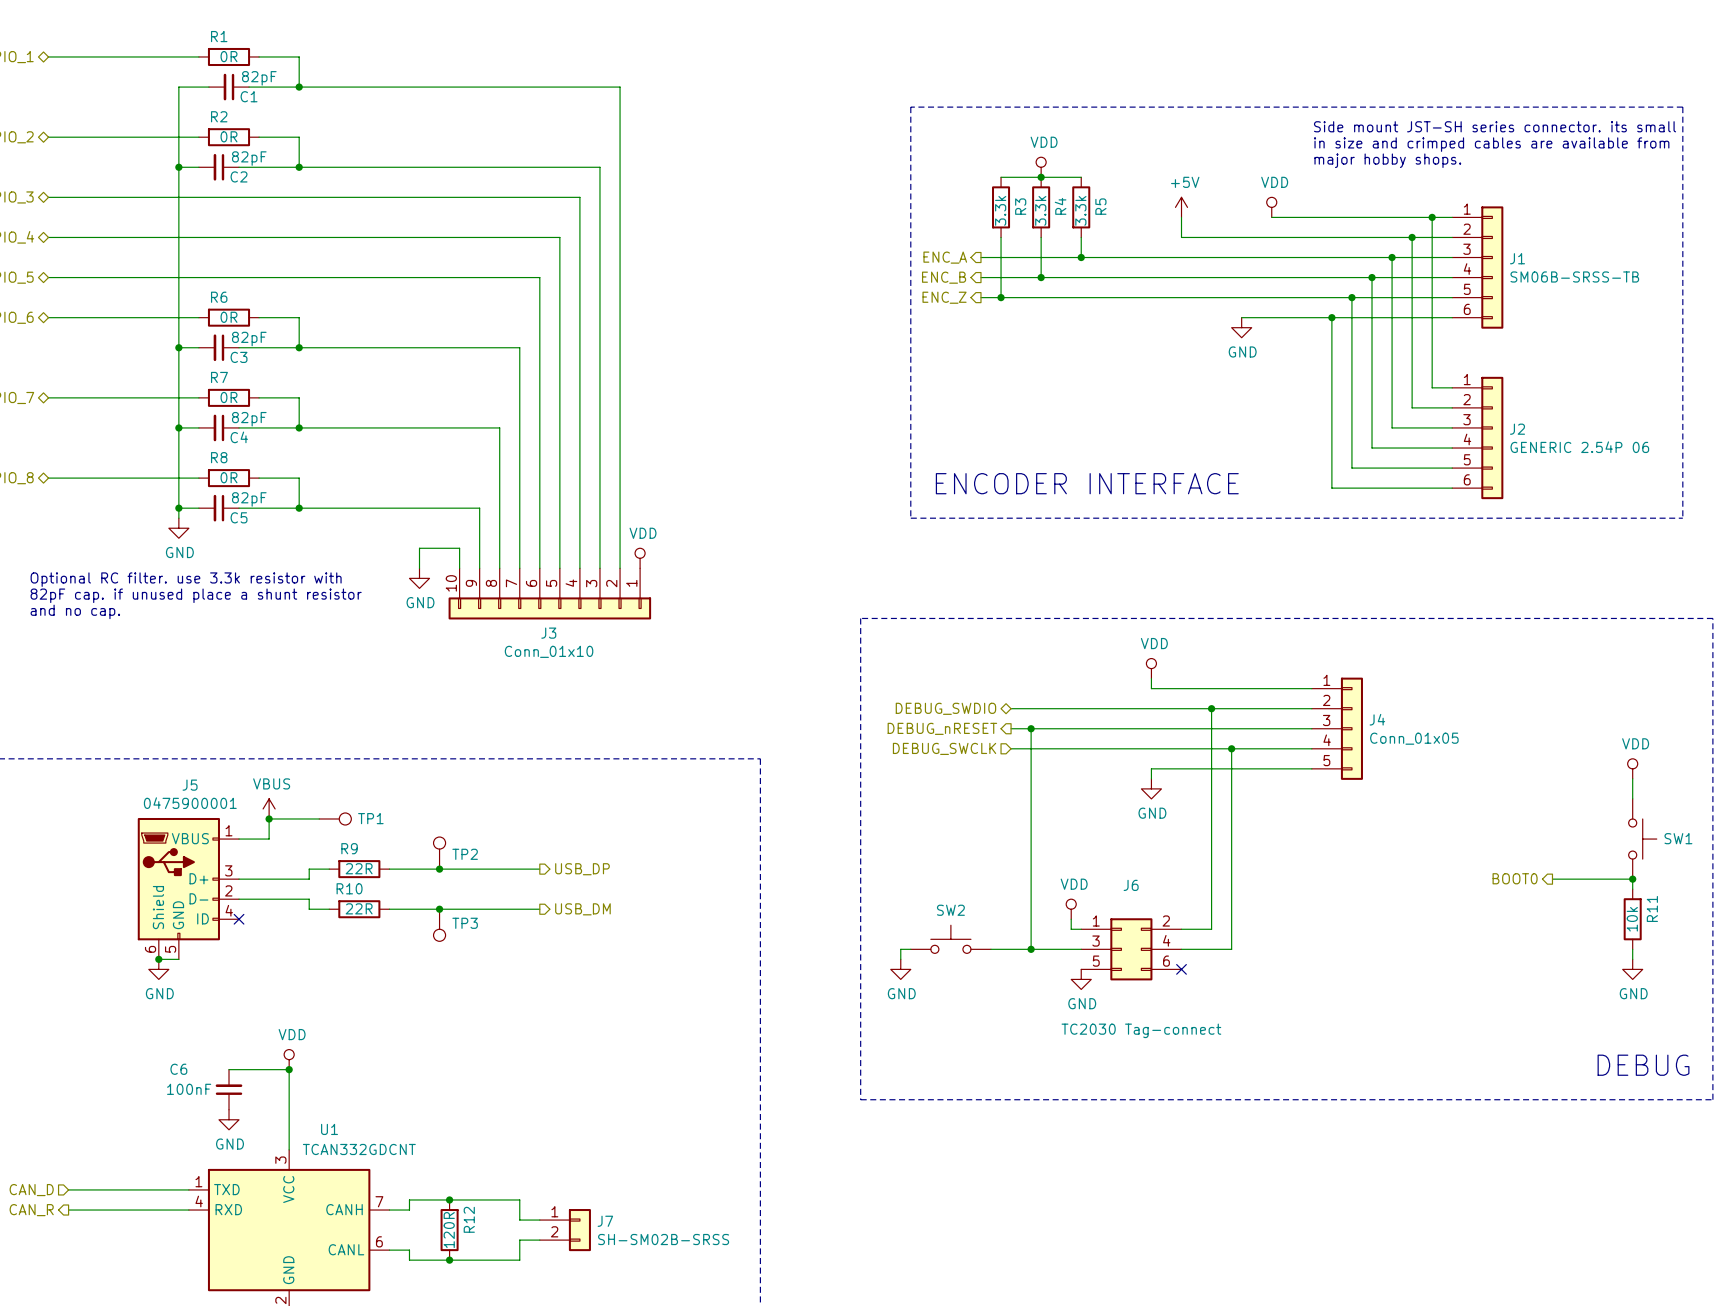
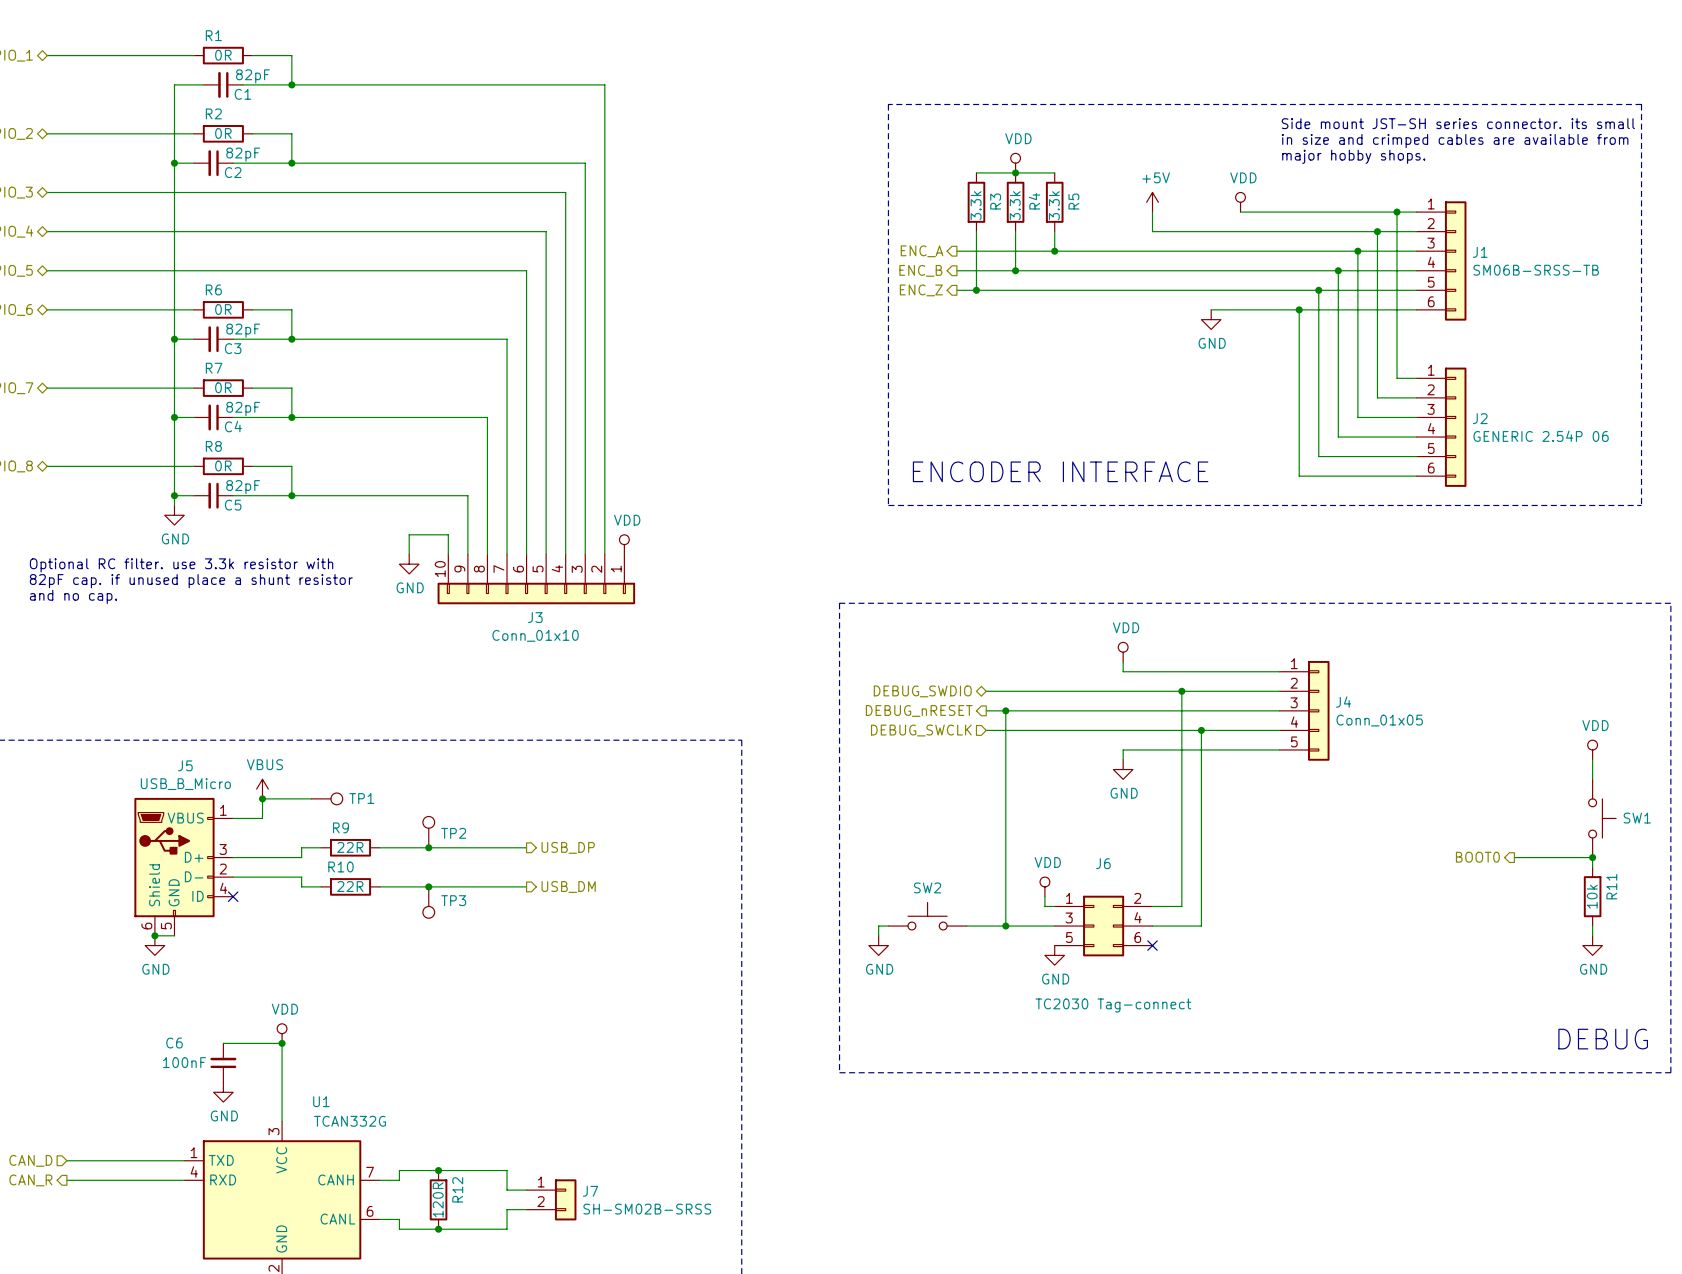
J5 value: 0475900001 (190, 803) -> USB_B_Micro (185, 784)
U1 value: TCAN332GDCNT (359, 1149) -> TCAN332G (350, 1121)

